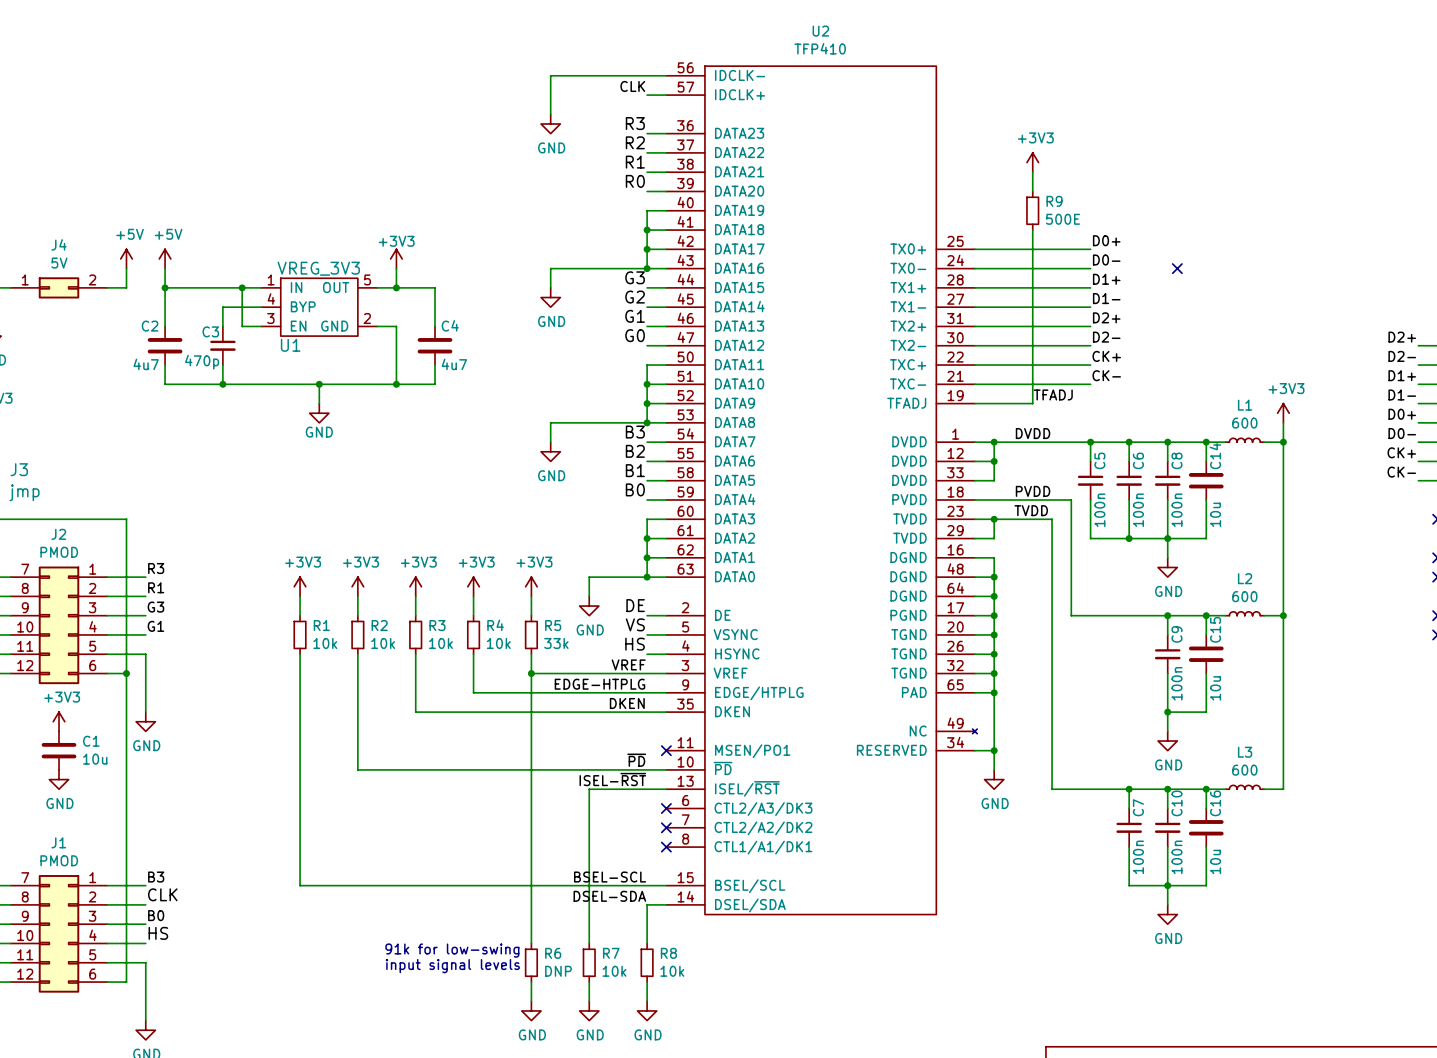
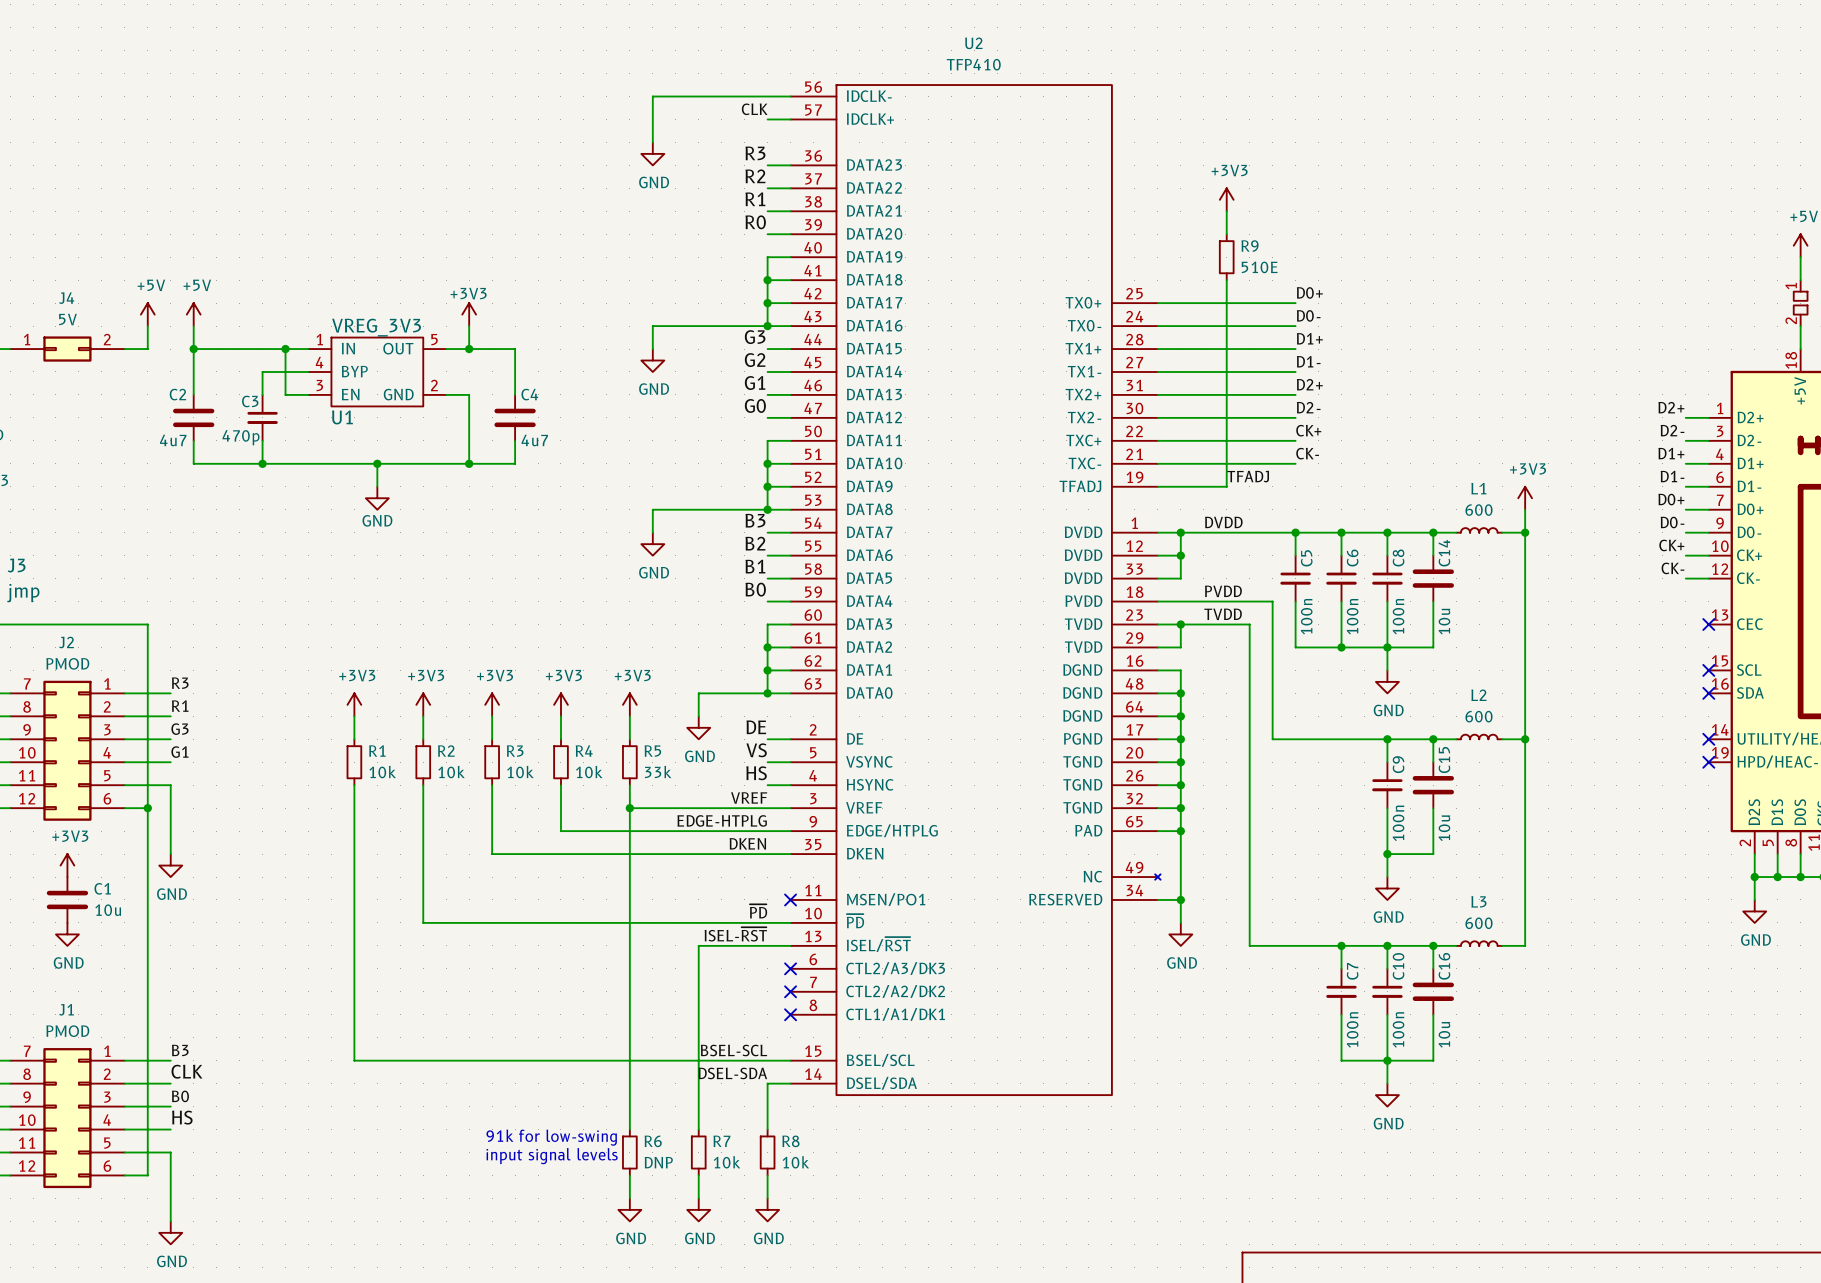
R9 value: 500E (1063, 219) -> 510E (1259, 267)
no-connect mark: (1177, 268) -> none

